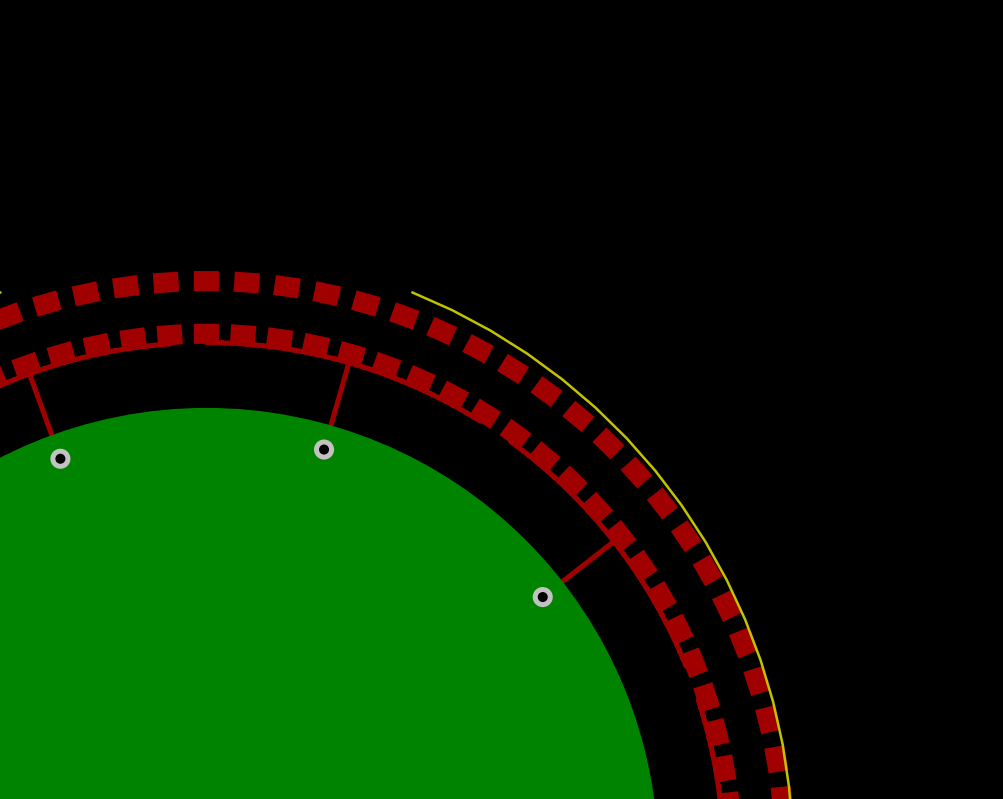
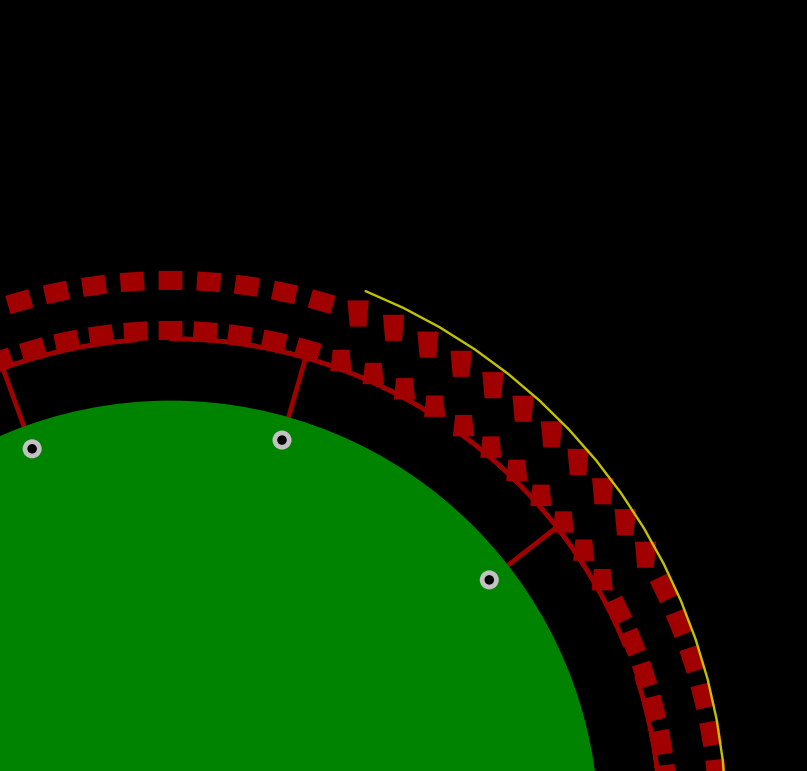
part footprint: [371, 302, 420, 380] -> [330, 300, 369, 372]
part footprint: [404, 316, 458, 394] -> [362, 314, 405, 385]
part footprint: [437, 334, 494, 411] -> [393, 331, 439, 400]
part footprint: [469, 353, 530, 429] -> [423, 350, 472, 417]
part footprint: [499, 376, 563, 450] -> [452, 372, 504, 437]
part footprint: [528, 400, 595, 473] -> [480, 395, 534, 458]
part footprint: [555, 427, 625, 498] -> [506, 421, 563, 482]
part footprint: [581, 456, 653, 524] -> [530, 448, 589, 507]
part footprint: [605, 487, 679, 553] -> [552, 478, 614, 533]
part footprint: [627, 520, 702, 582] -> [573, 509, 636, 561]
part footprint: [646, 554, 723, 613] -> [591, 541, 657, 591]

